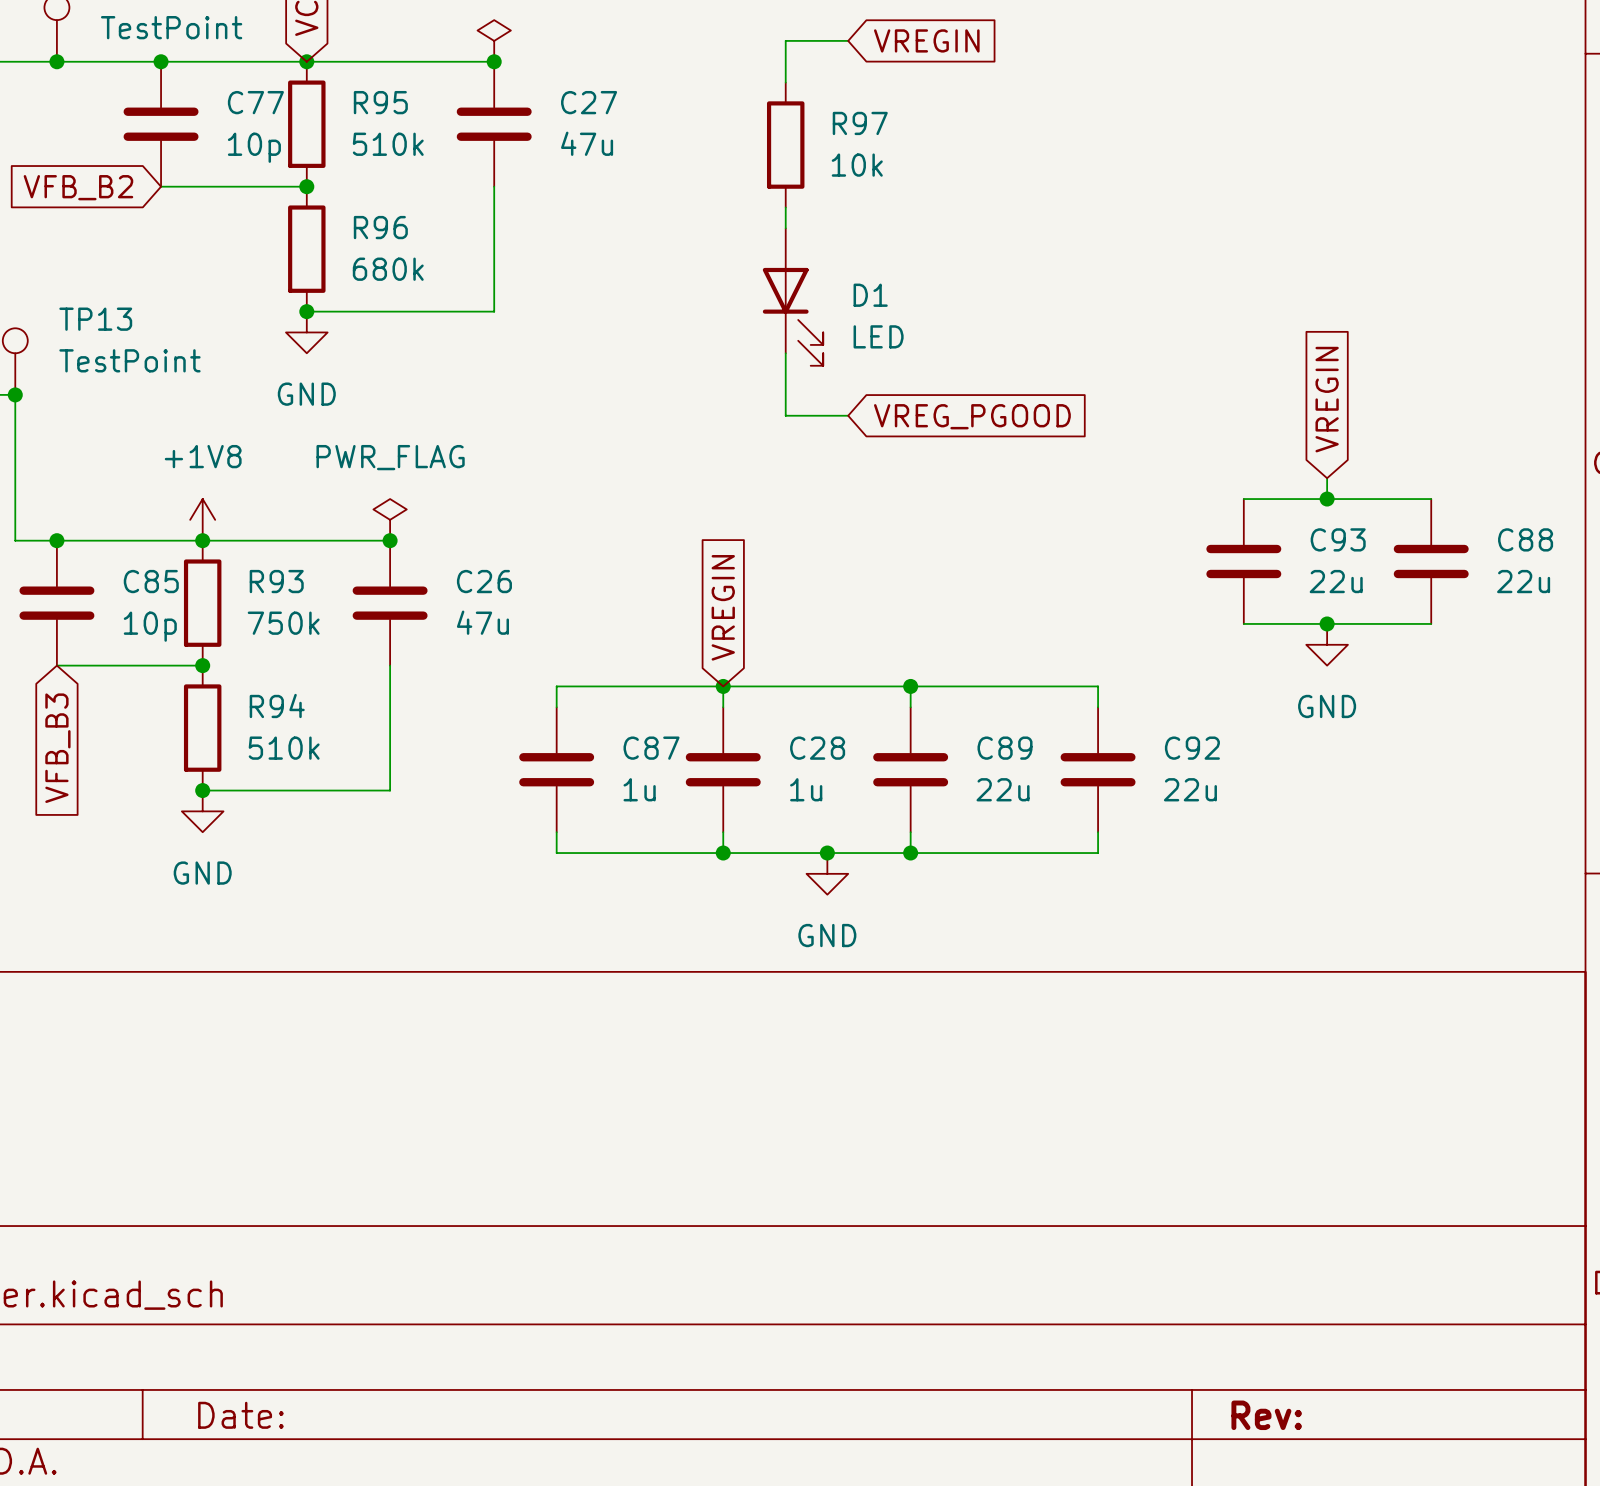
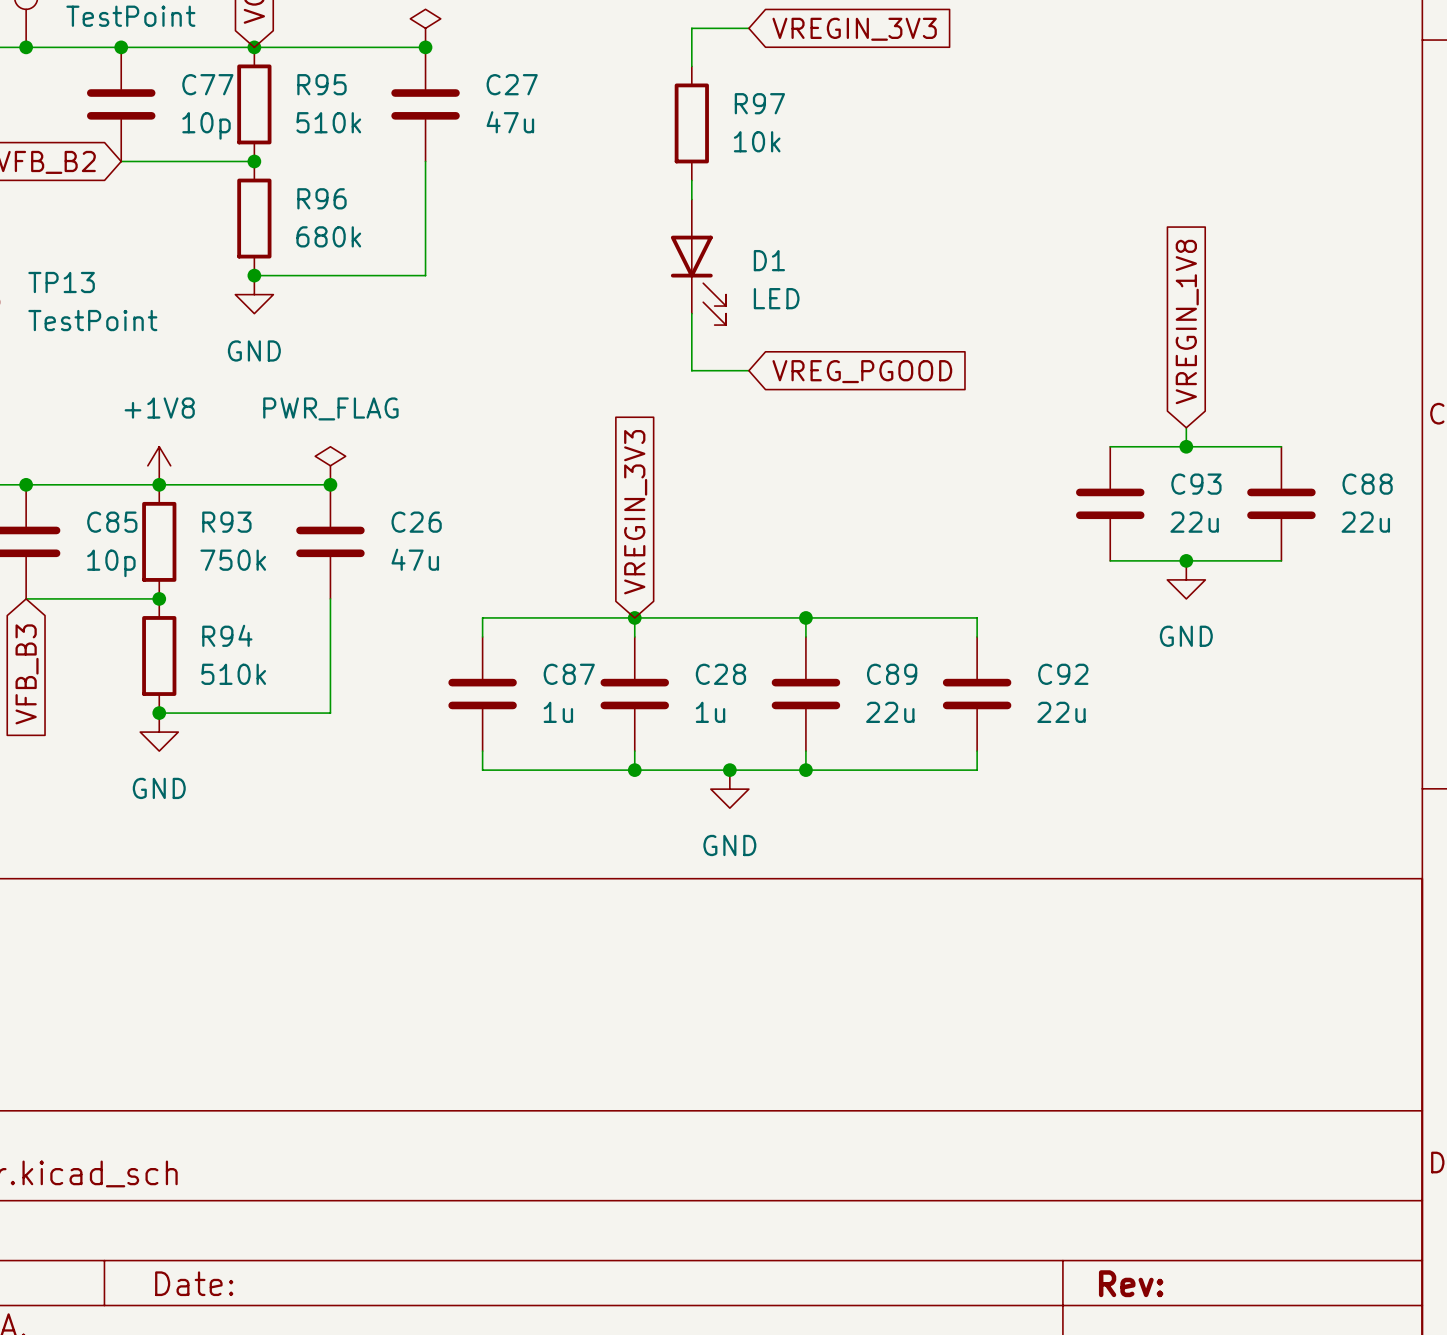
global label: VREGIN (926, 40) -> VREGIN_3V3 (854, 29)
global label: VREGIN (1327, 399) -> VREGIN_1V8 (1187, 321)
global label: VREGIN (723, 607) -> VREGIN_3V3 (635, 512)

